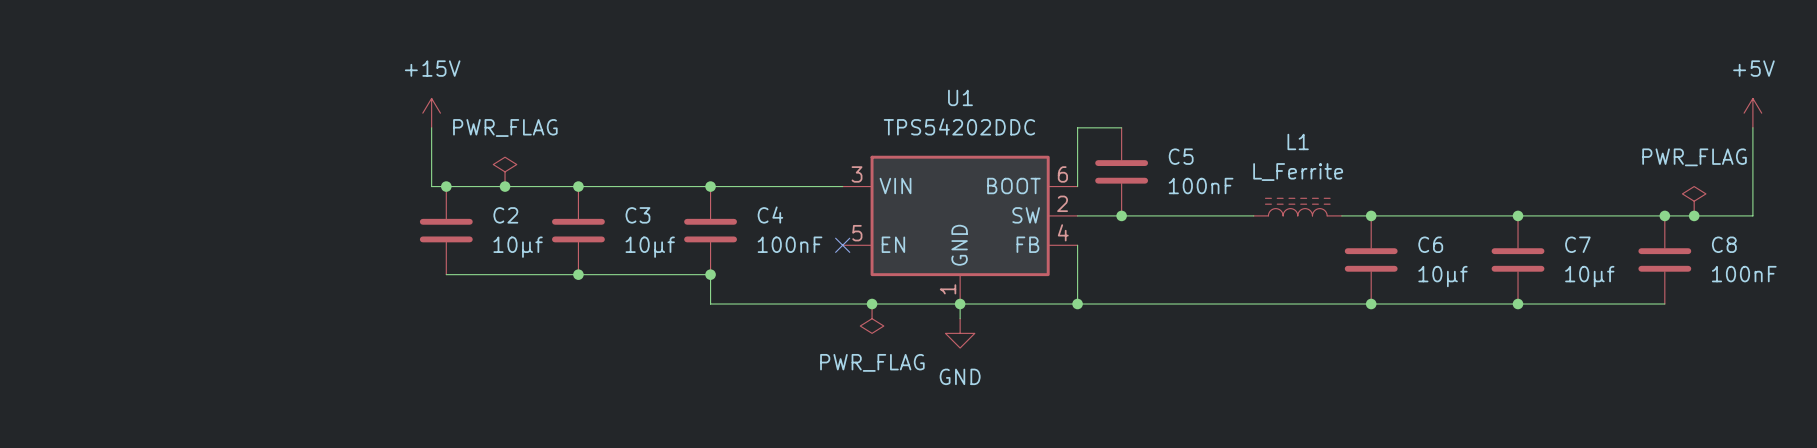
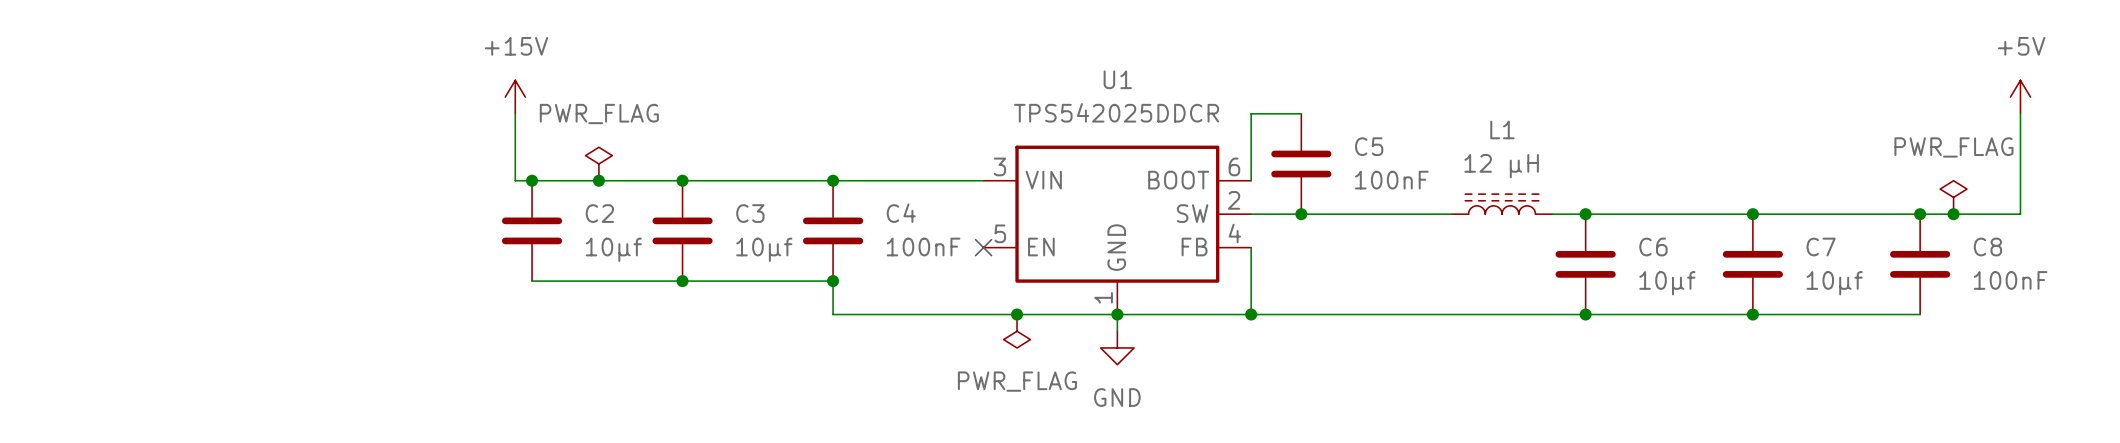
U1 value: TPS54202DDC (959, 126) -> TPS542025DDCR (1116, 112)
L1 value: L_Ferrite (1298, 172) -> 12 µH (1501, 166)

